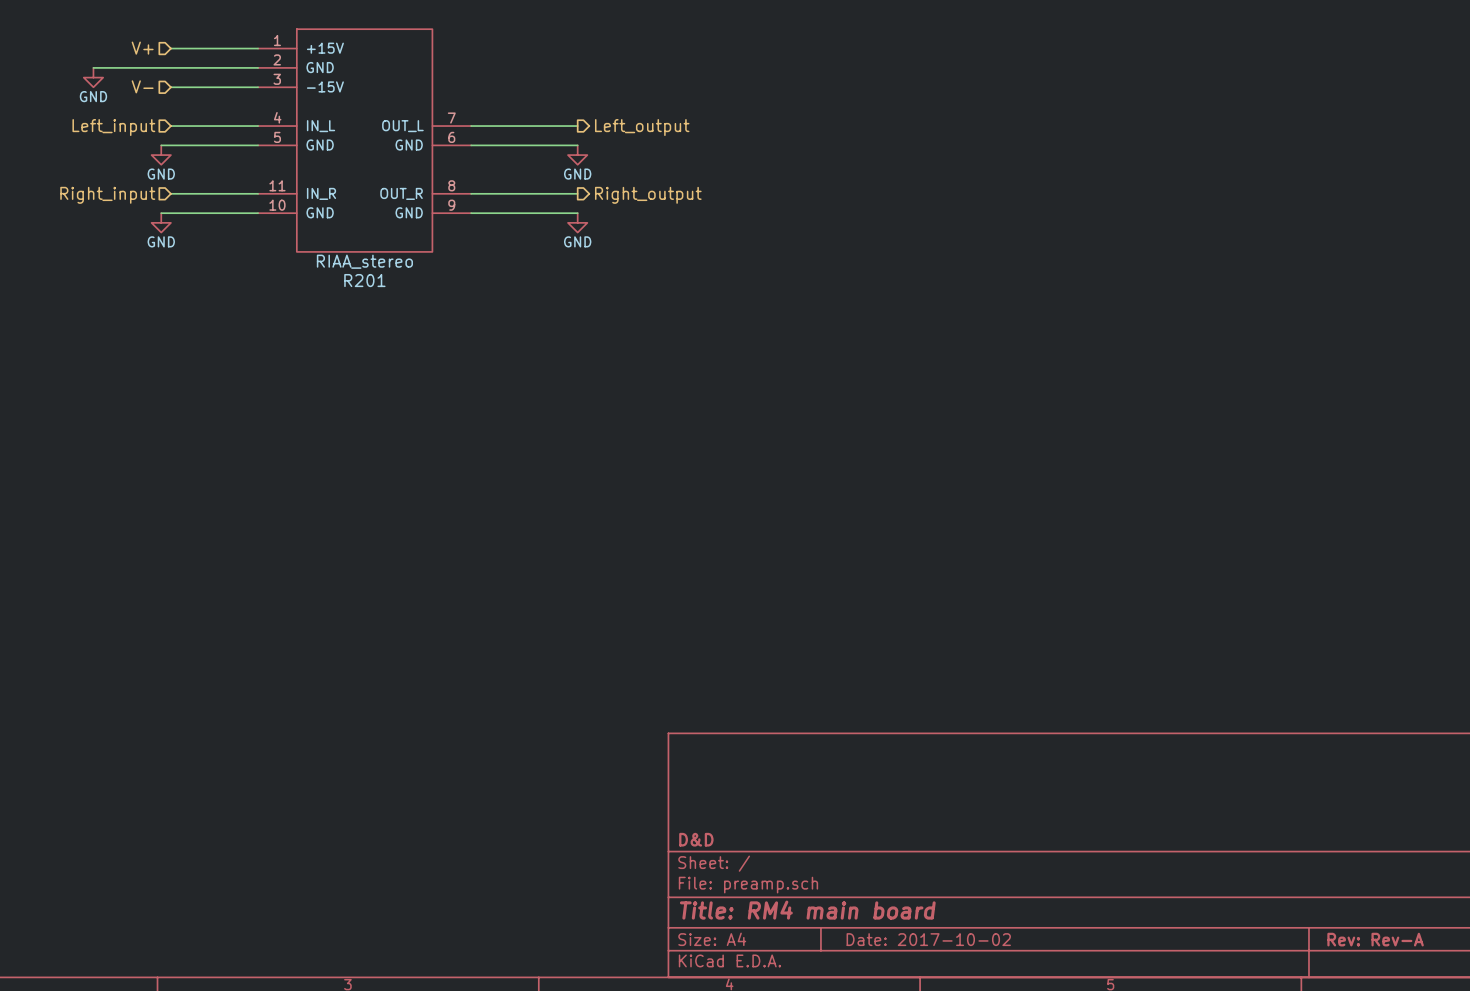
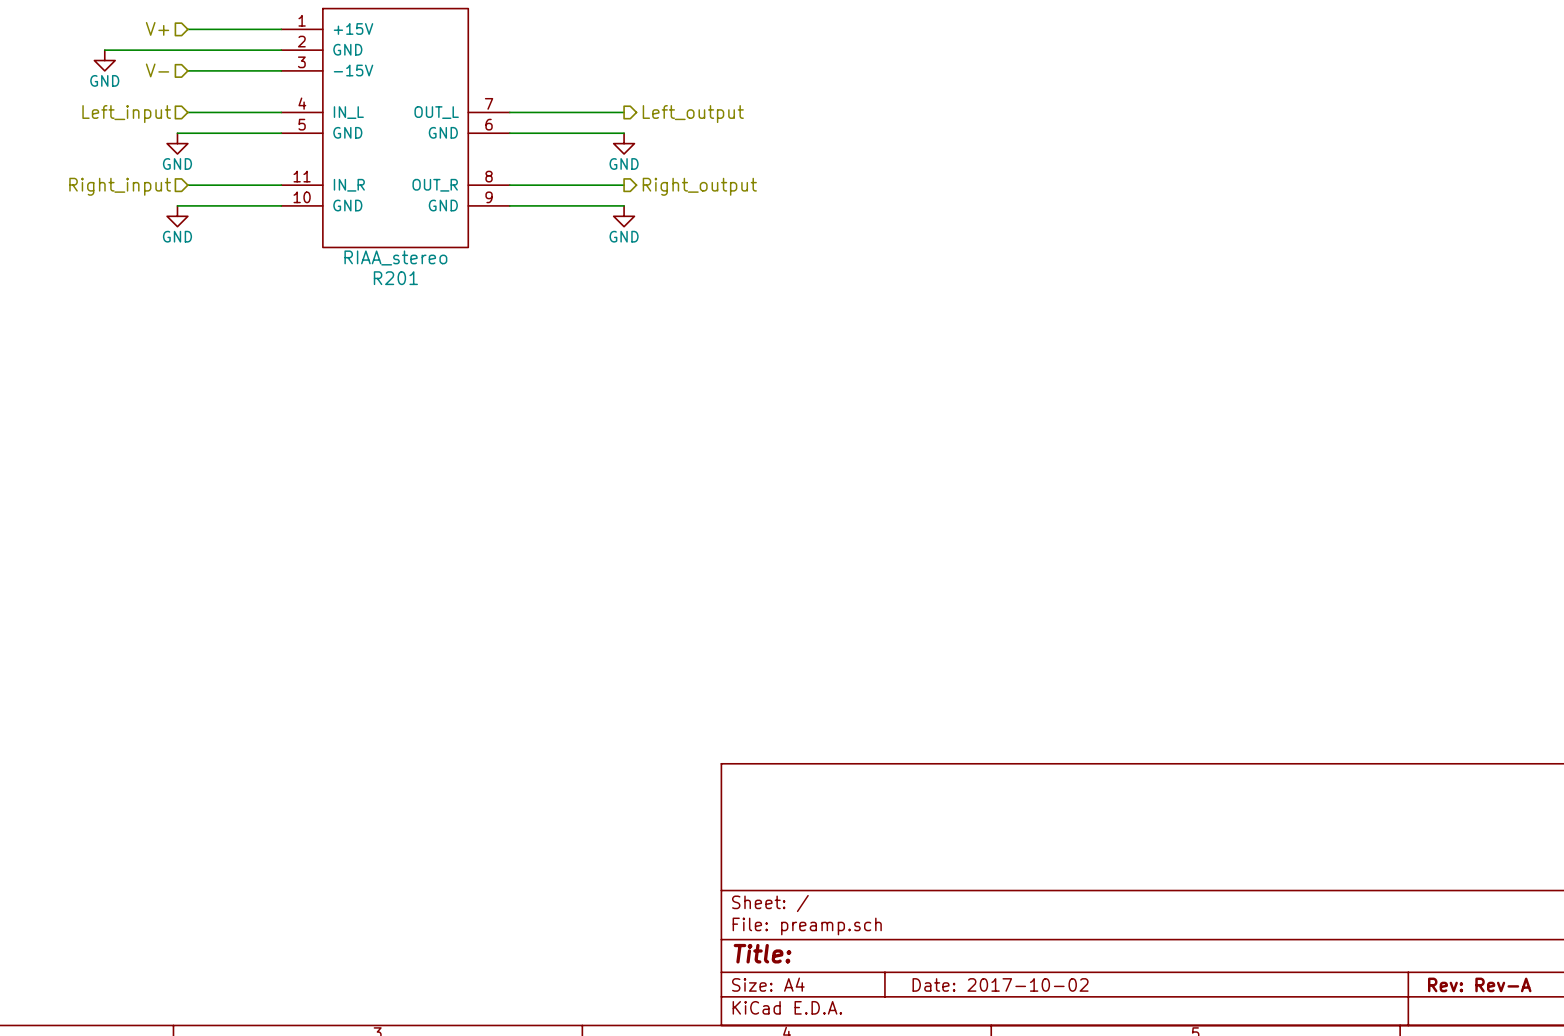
title block: D&D (696, 839) -> none
title block: Title: RM4 main board (807, 910) -> Title: (762, 953)

